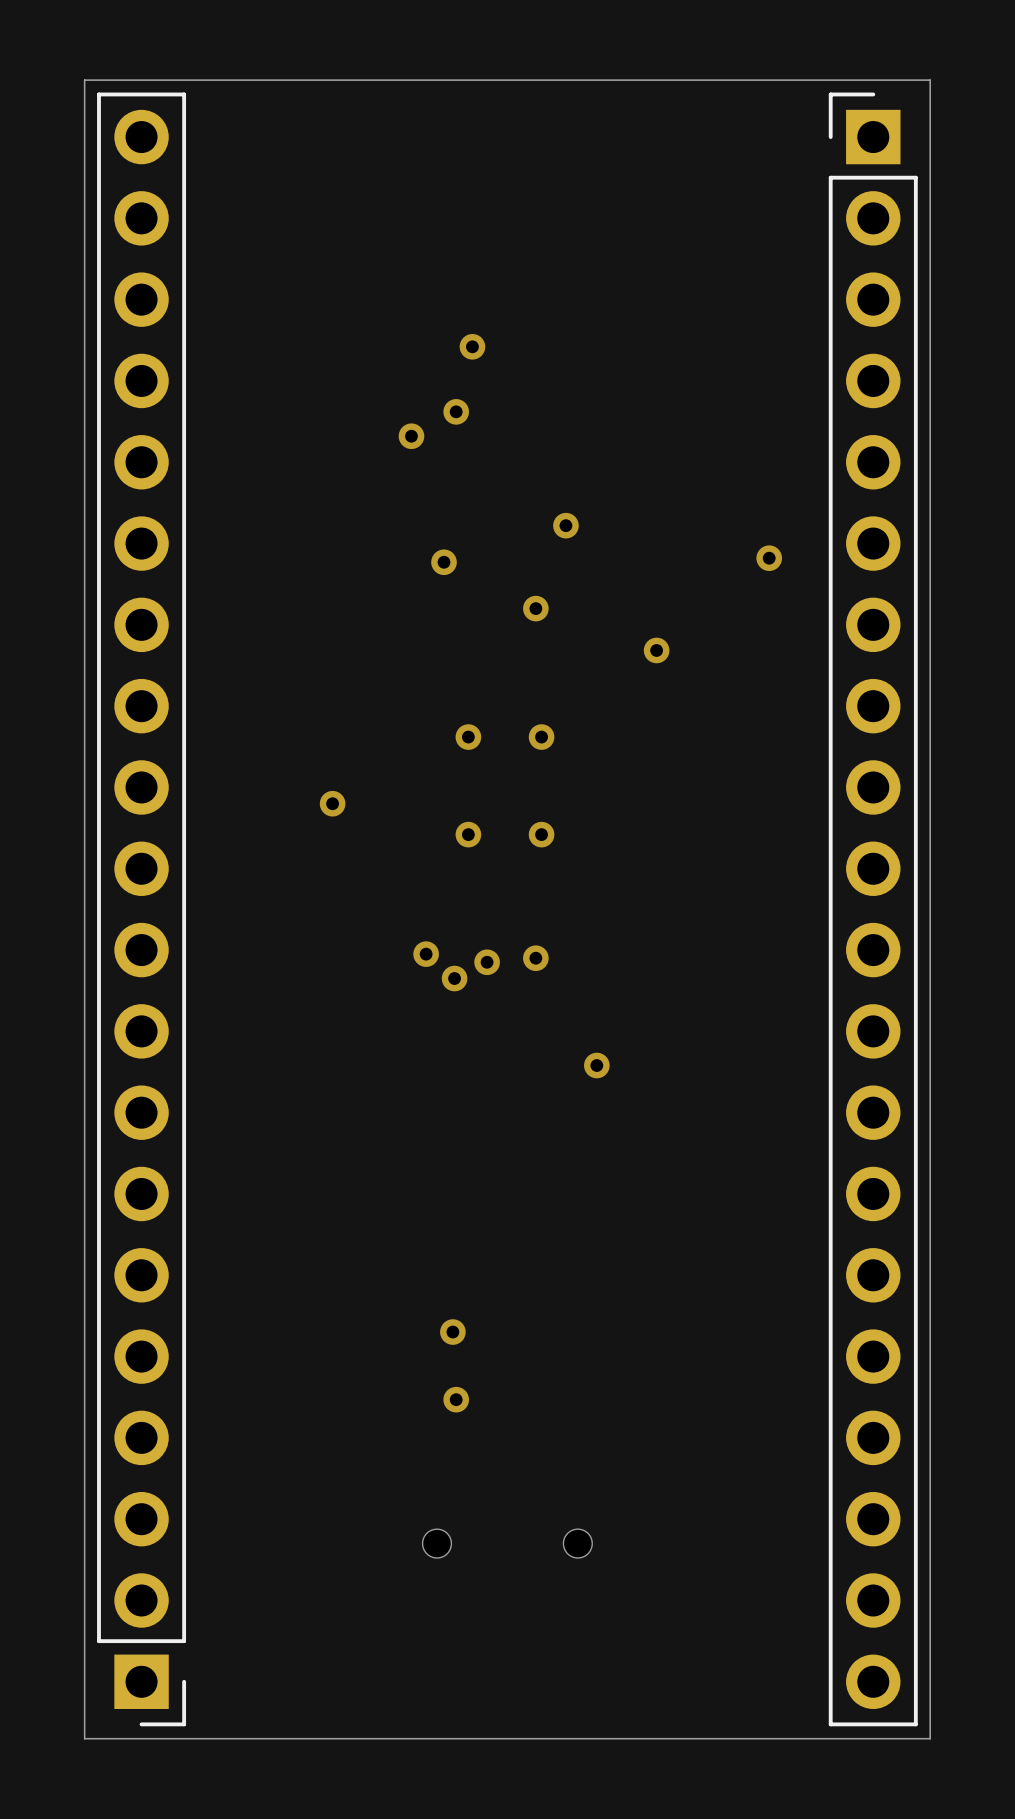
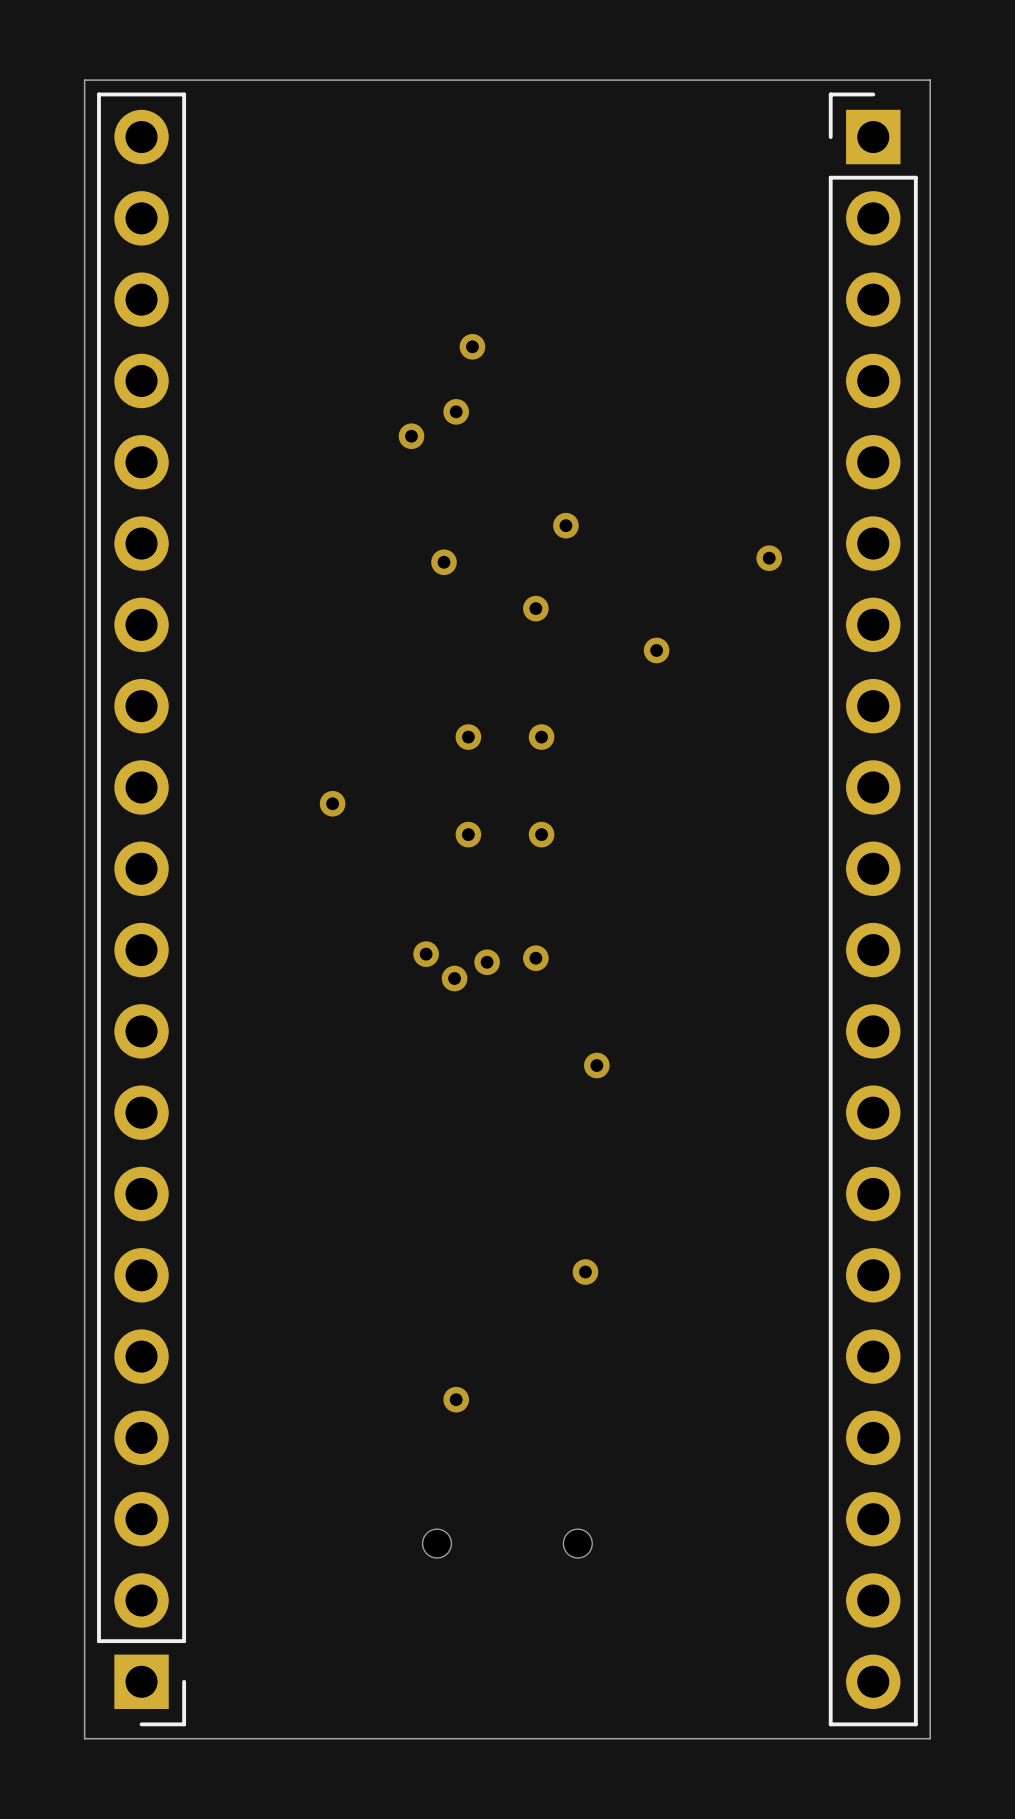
via position: (452, 1332) -> (585, 1272)

